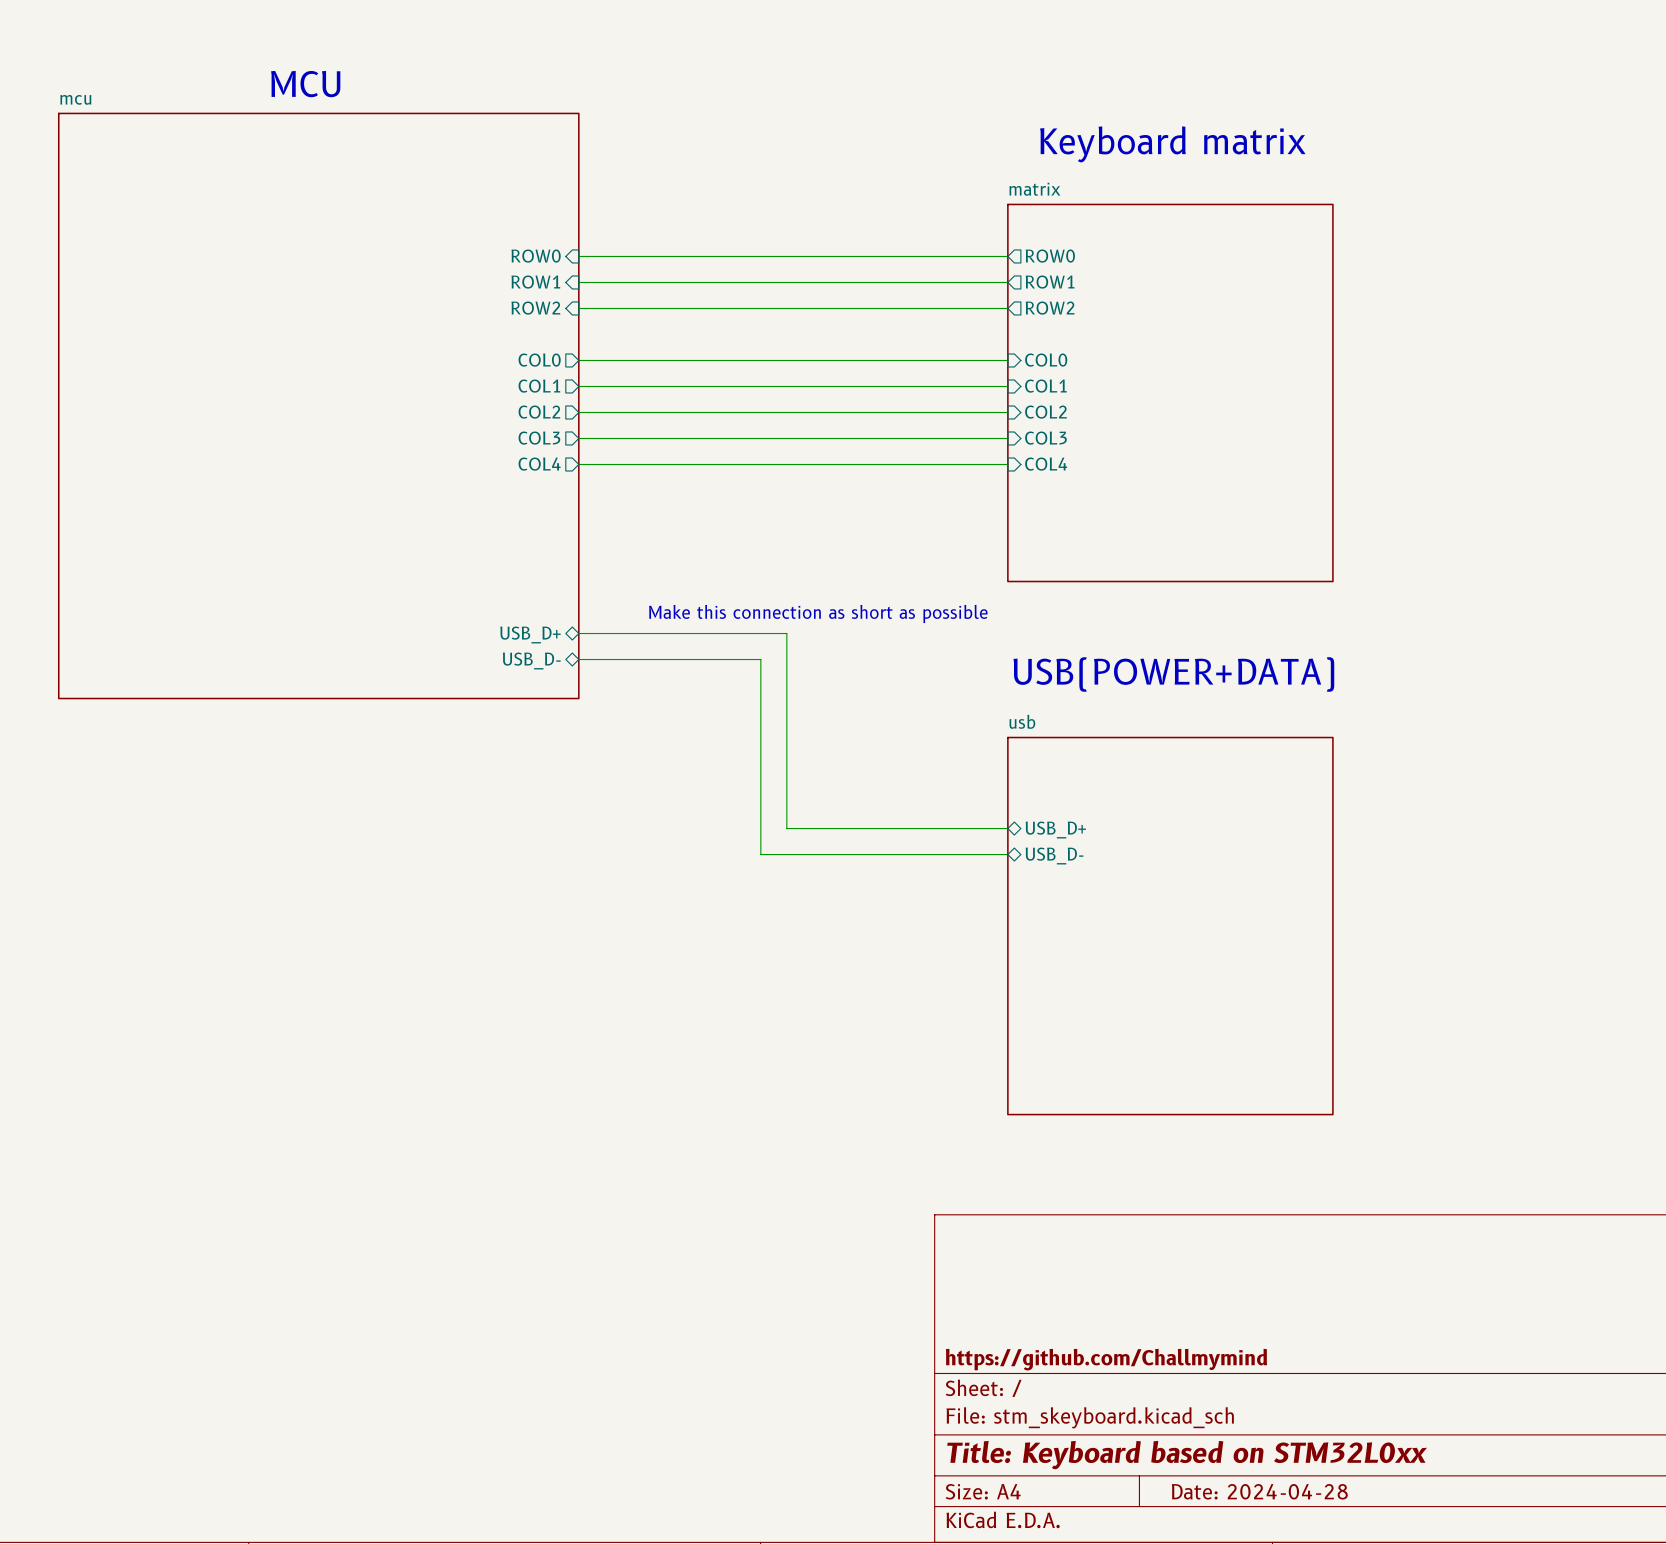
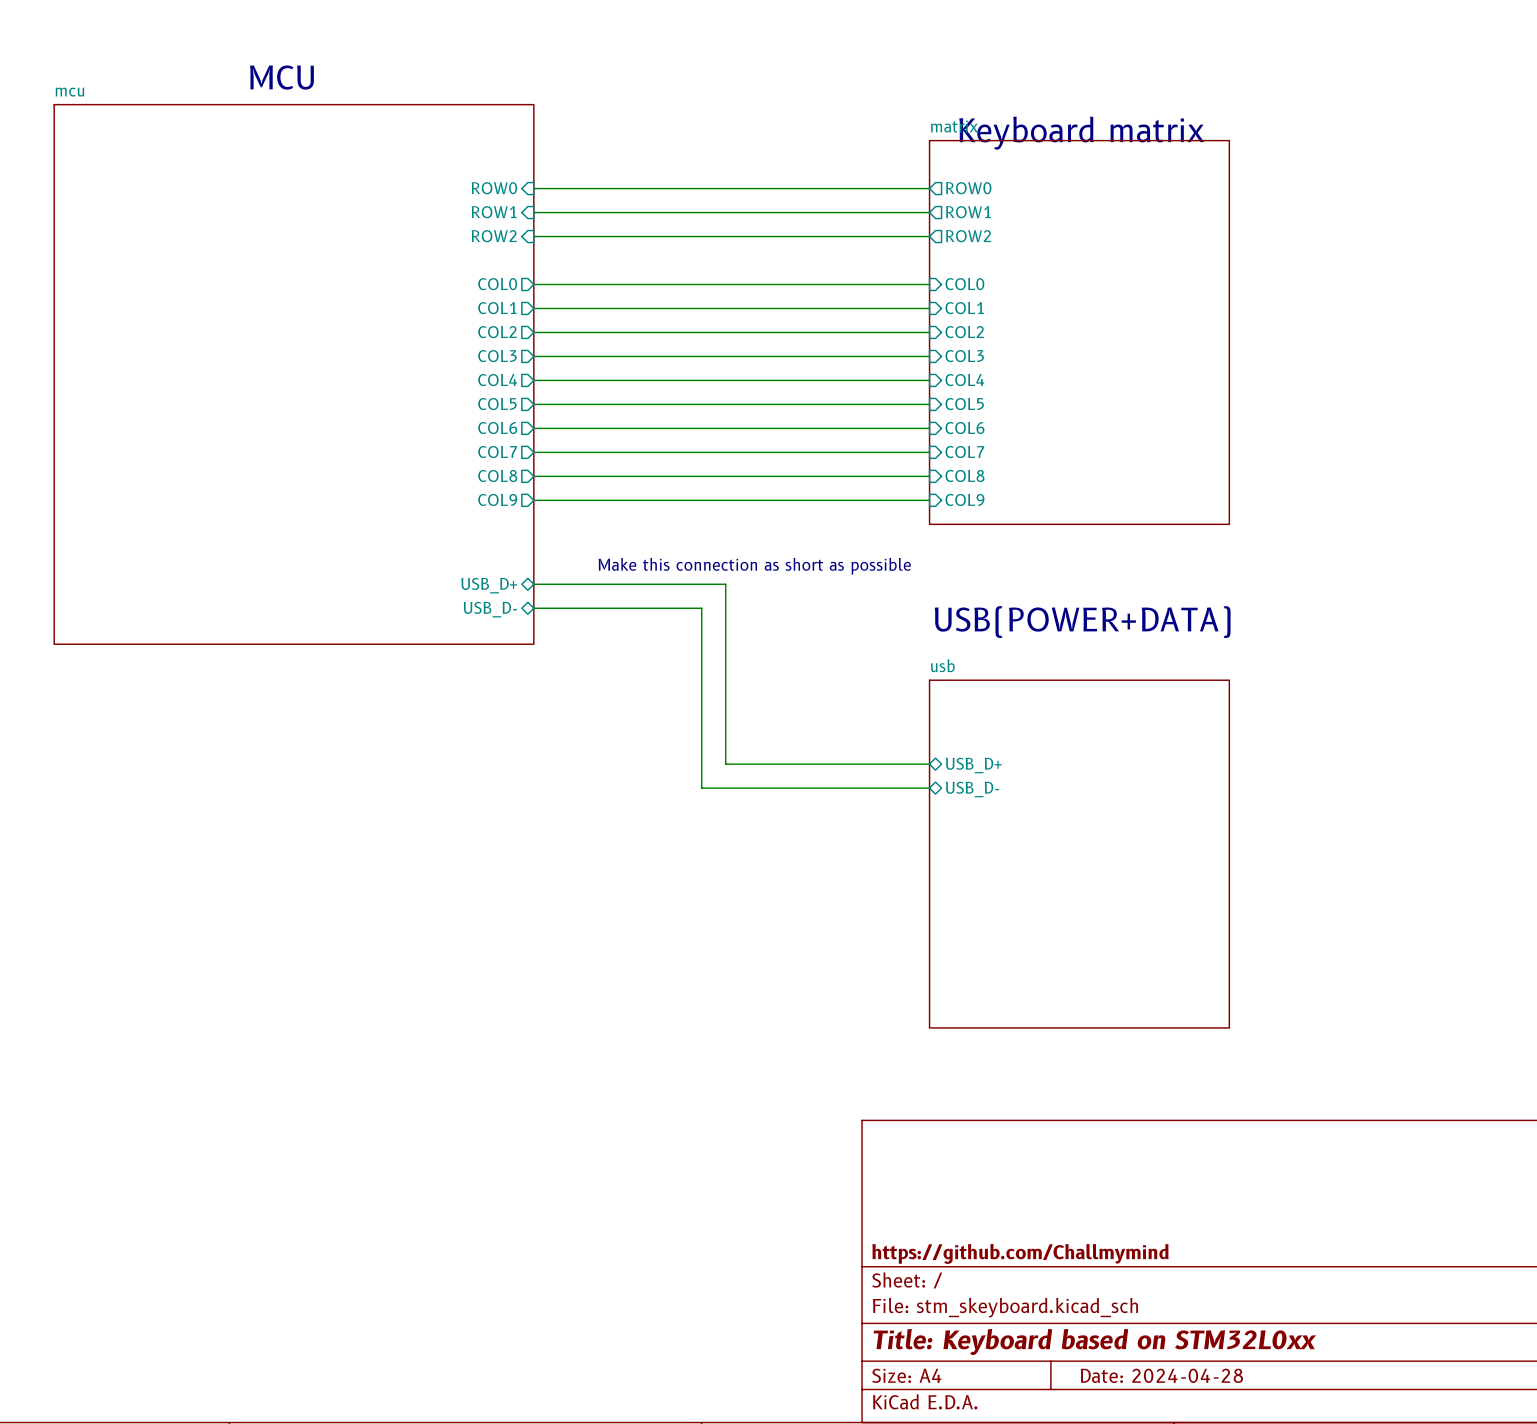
sheet pin: none -> ROW0 (494, 188)
wire: none -> (533, 188) (929, 188)
sheet pin: none -> ROW0 (968, 188)
wire: none -> (533, 212) (929, 212)
sheet pin: ROW0 (536, 256) -> ROW2 (494, 236)
sheet pin: ROW0 (1050, 256) -> ROW2 (968, 236)
sheet pin position: ROW1 (535, 282) -> ROW1 (494, 212)
wire: (578, 282) (1007, 282) -> (533, 308) (929, 308)
sheet pin position: ROW1 (1050, 282) -> ROW1 (968, 212)
sheet pin shape: input (535, 308) -> output (497, 284)
sheet pin: ROW2 (535, 308) -> COL0 (497, 284)
sheet pin shape: output (1050, 308) -> input (964, 284)
sheet pin: ROW2 (1050, 308) -> COL0 (964, 284)
sheet pin: none -> COL1 (497, 308)
sheet pin: none -> COL1 (964, 308)
sheet pin: COL0 (539, 360) -> COL2 (497, 332)
sheet pin: COL0 (1046, 360) -> COL2 (964, 332)
sheet matrix: none -> (1079, 332)
sheet pin: COL1 (539, 386) -> COL3 (497, 356)
sheet pin: COL1 (1045, 386) -> COL3 (964, 356)
sheet matrix: (1170, 392) -> none
sheet pin: COL2 (539, 412) -> COL4 (497, 380)
sheet pin: COL2 (1045, 412) -> COL4 (964, 380)
sheet pin: COL3 (539, 438) -> COL5 (497, 404)
sheet pin: COL3 (1045, 438) -> COL5 (964, 404)
sheet pin: COL4 (539, 464) -> COL6 (497, 428)
sheet pin: COL4 (1046, 464) -> COL6 (964, 428)
sheet pin: none -> COL7 (497, 452)
wire: none -> (533, 452) (929, 452)
sheet pin: none -> COL7 (964, 452)
sheet pin: none -> COL8 (497, 475)
wire: none -> (533, 476) (929, 476)
sheet pin: none -> COL8 (964, 475)
sheet pin: none -> COL9 (497, 499)
wire: none -> (533, 500) (929, 500)
sheet pin: none -> COL9 (964, 499)

